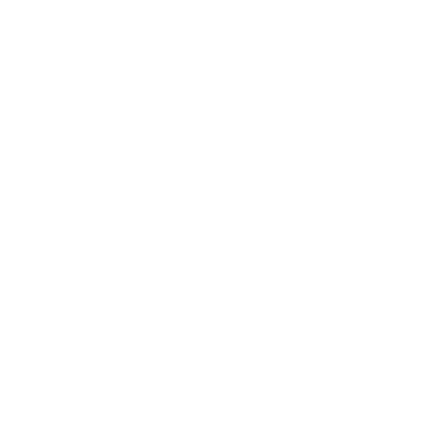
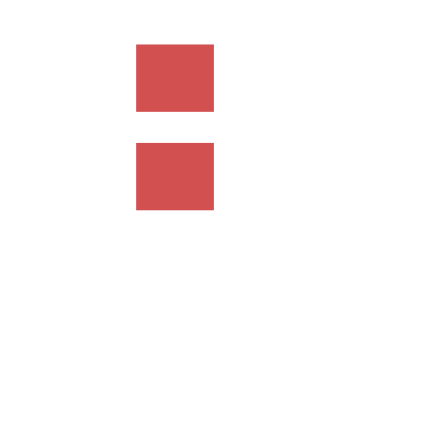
part: none -> (175, 127)

